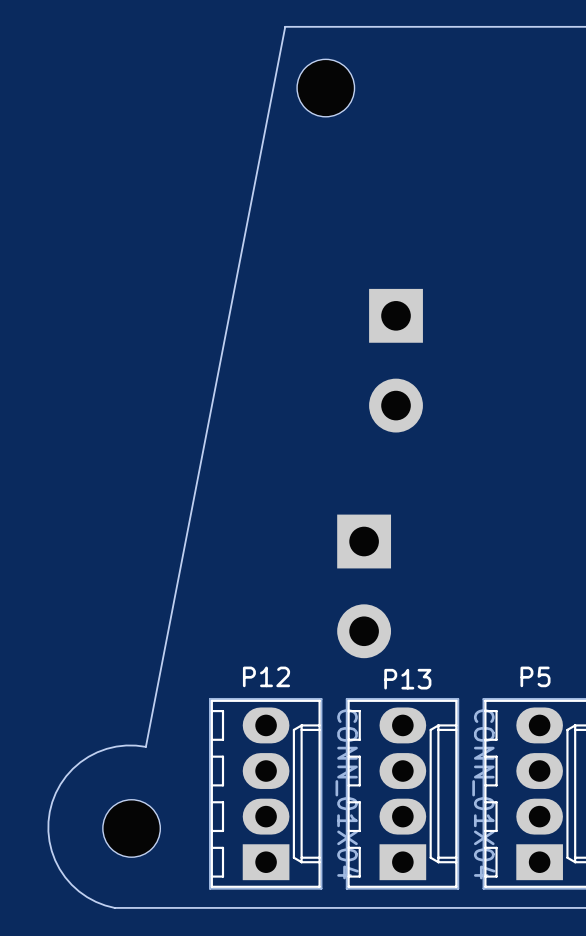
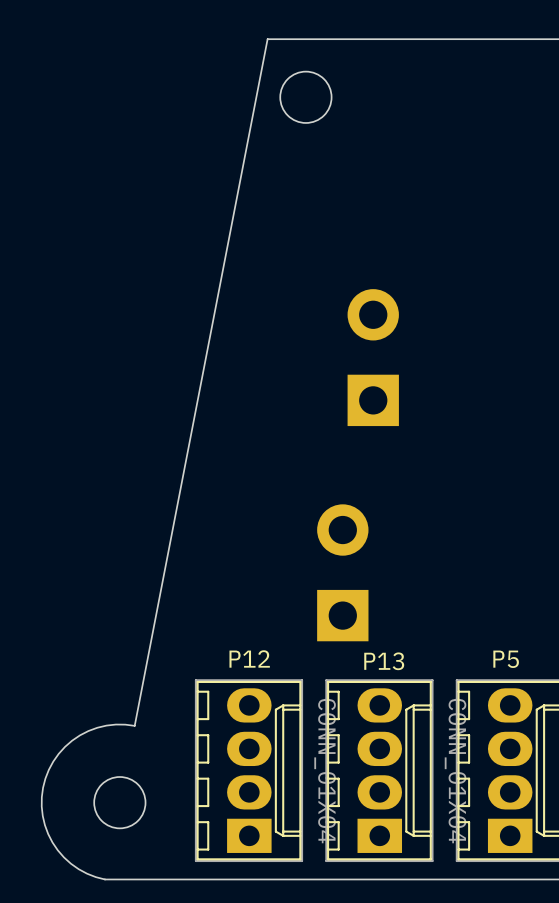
round board edge: none -> [279, 70, 333, 124]
part: (325, 88) -> none
part rotation: 0° (396, 360) -> 180° (373, 357)
part rotation: 0° (364, 586) -> 180° (342, 572)
round board edge: none -> [93, 776, 147, 830]
part: (131, 828) -> none

